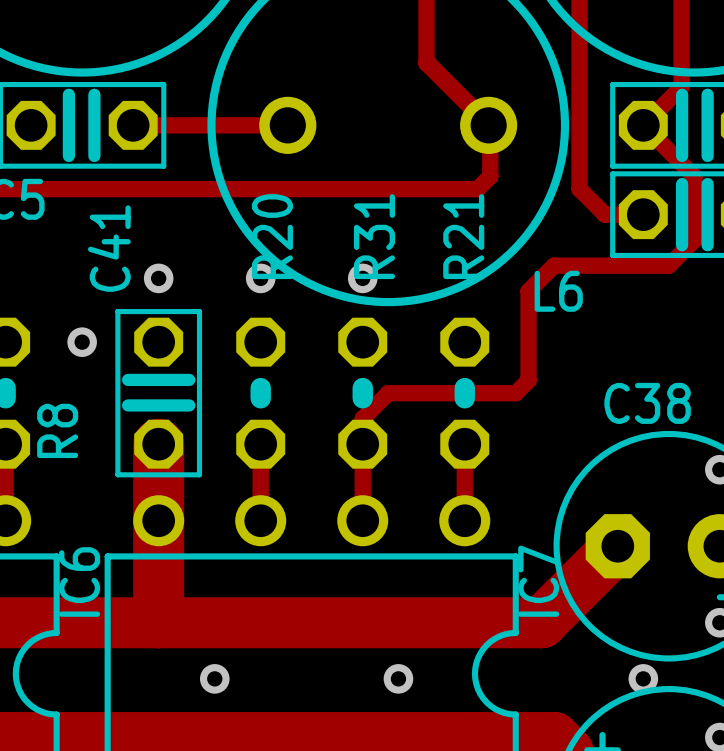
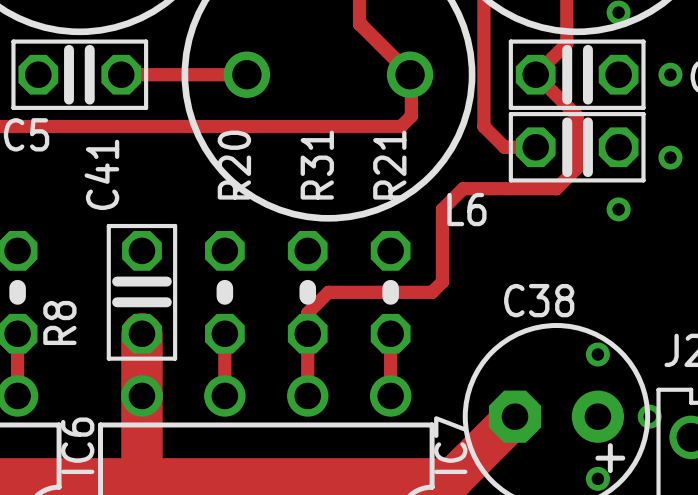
via: (158, 278) -> none
via: (260, 278) -> none
via: (362, 278) -> none
via: (82, 342) -> none

